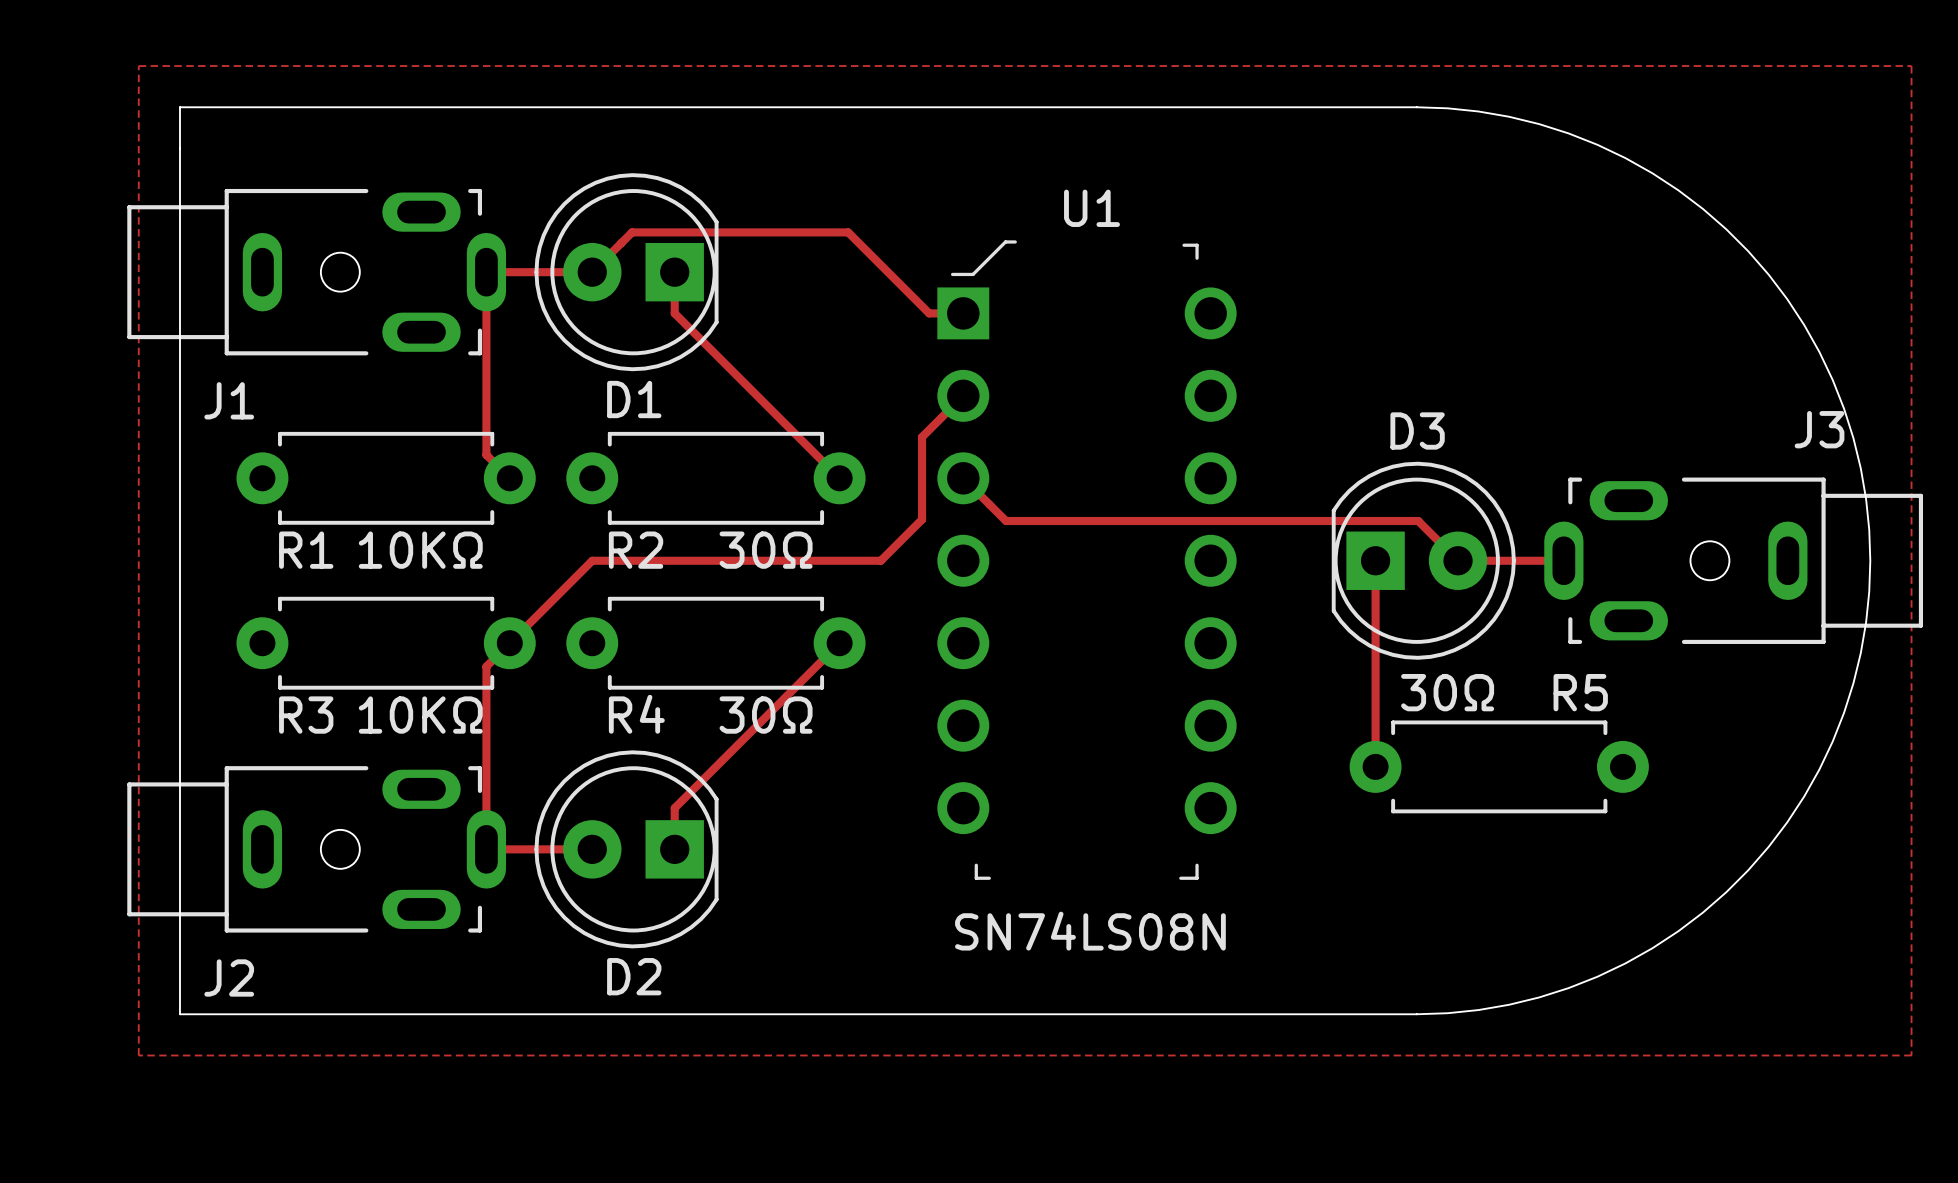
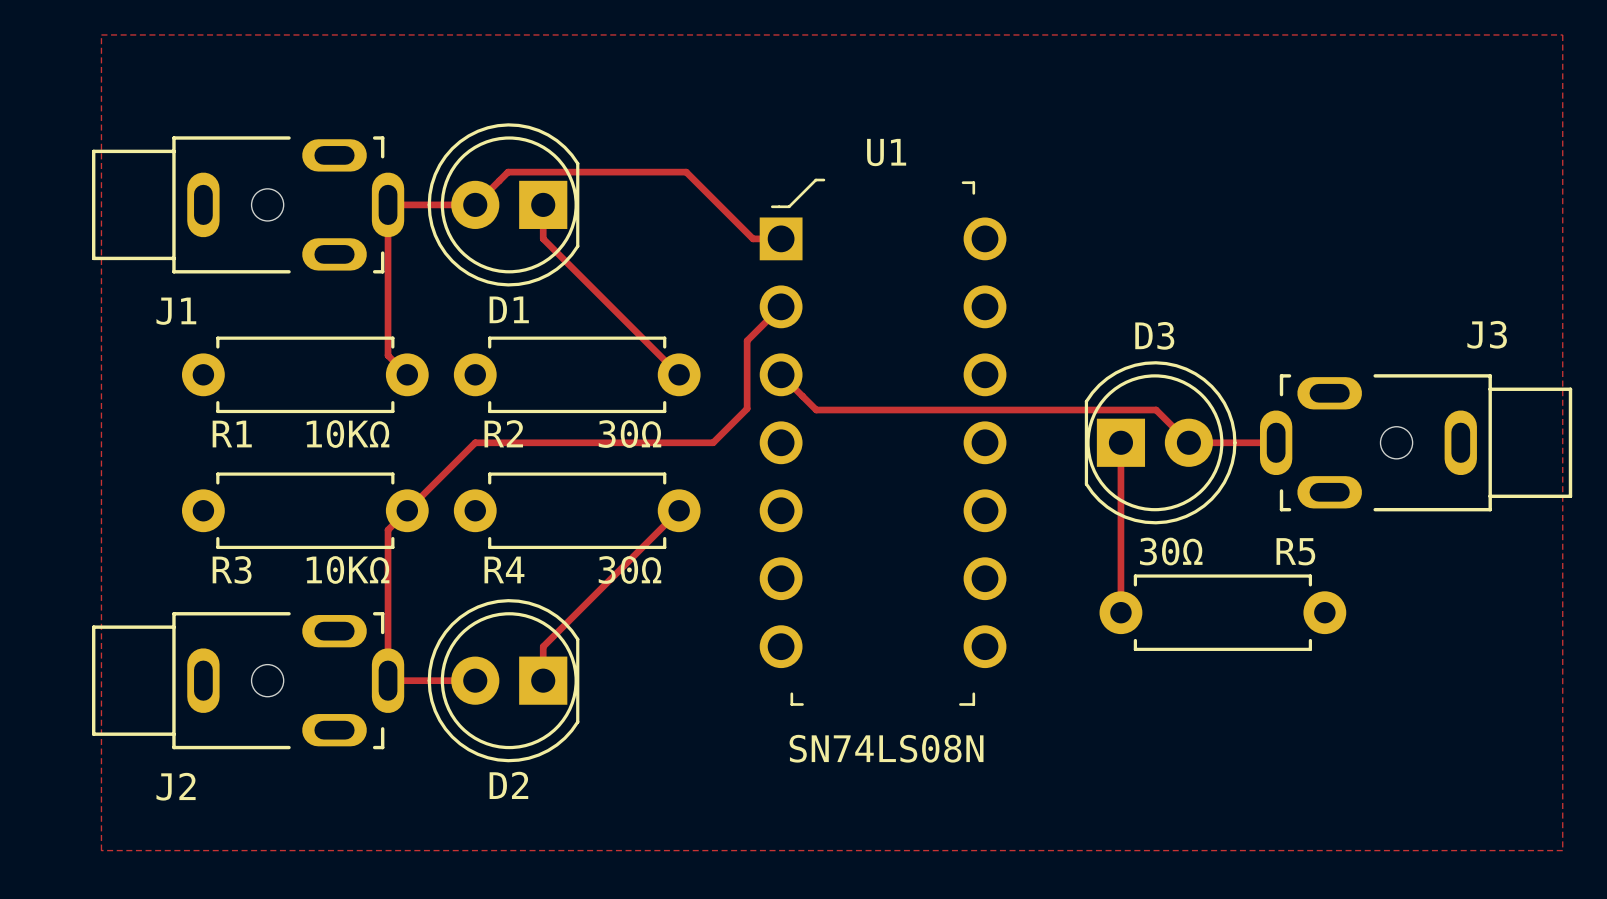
board edge: (179, 107) (1416, 107) (1447, 108) (1509, 116) (1568, 133) (1625, 158) (1652, 173) (1678, 190) (1726, 229) (1768, 274) (1787, 299) (1804, 325) (1832, 380) (1844, 408) (1860, 468) (1866, 499) (1870, 560) (1866, 622) (1853, 683) (1844, 712) (1819, 769) (1787, 822) (1748, 870) (1703, 912) (1652, 948) (1597, 976) (1539, 997) (1509, 1004) (1447, 1013) (1416, 1014) (179, 1014) (179, 107) -> none

